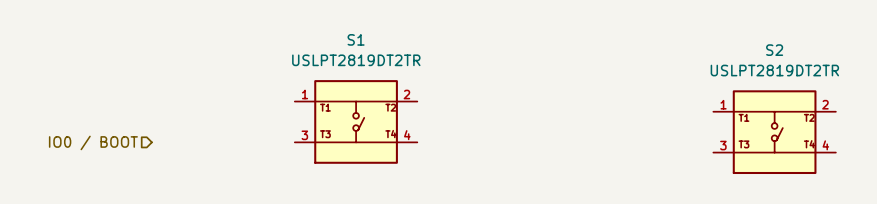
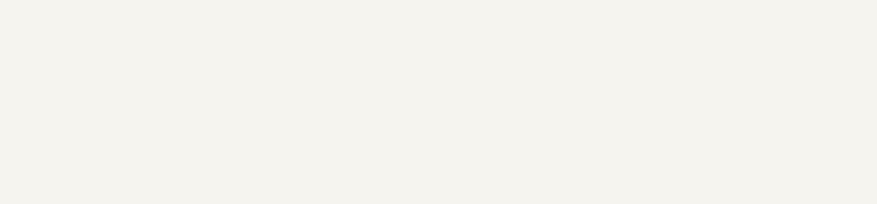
S1: USLPT2819DT2TR (356, 121) -> none
S2: USLPT2819DT2TR (774, 132) -> none
hierarchical label: IO0 / BOOT (93, 142) -> none

